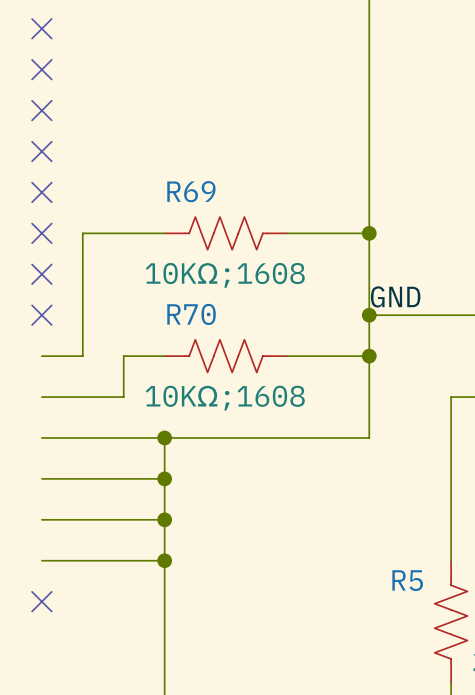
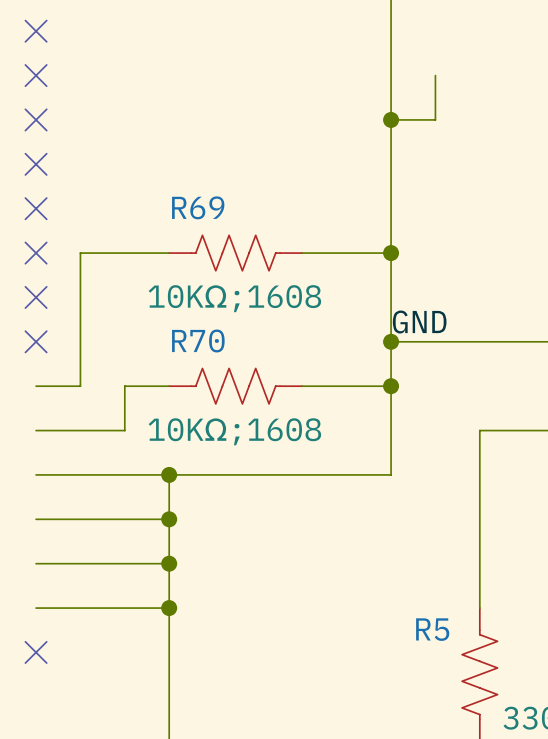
wire: none -> (435, 75) (435, 119) (391, 119)
junction: none -> (391, 119)

